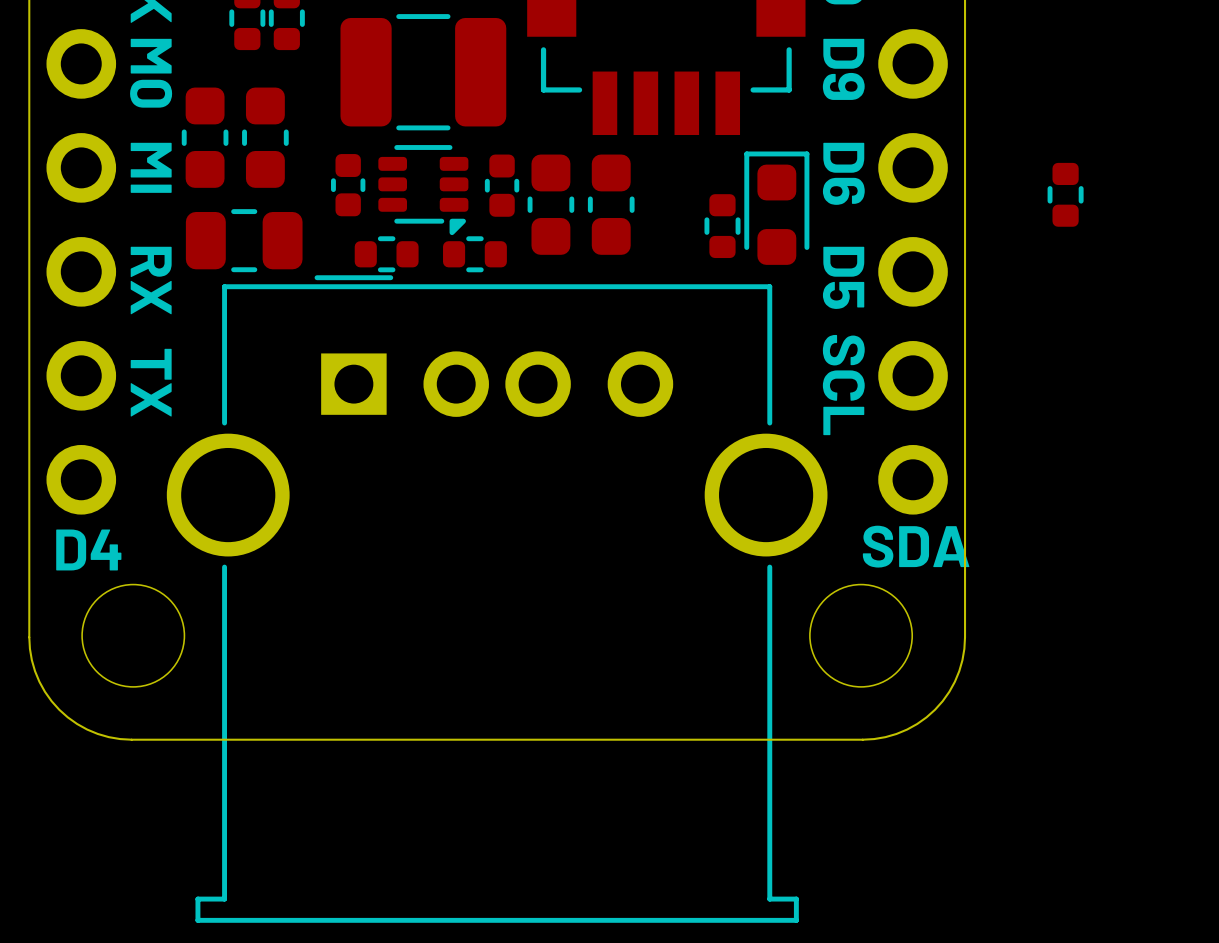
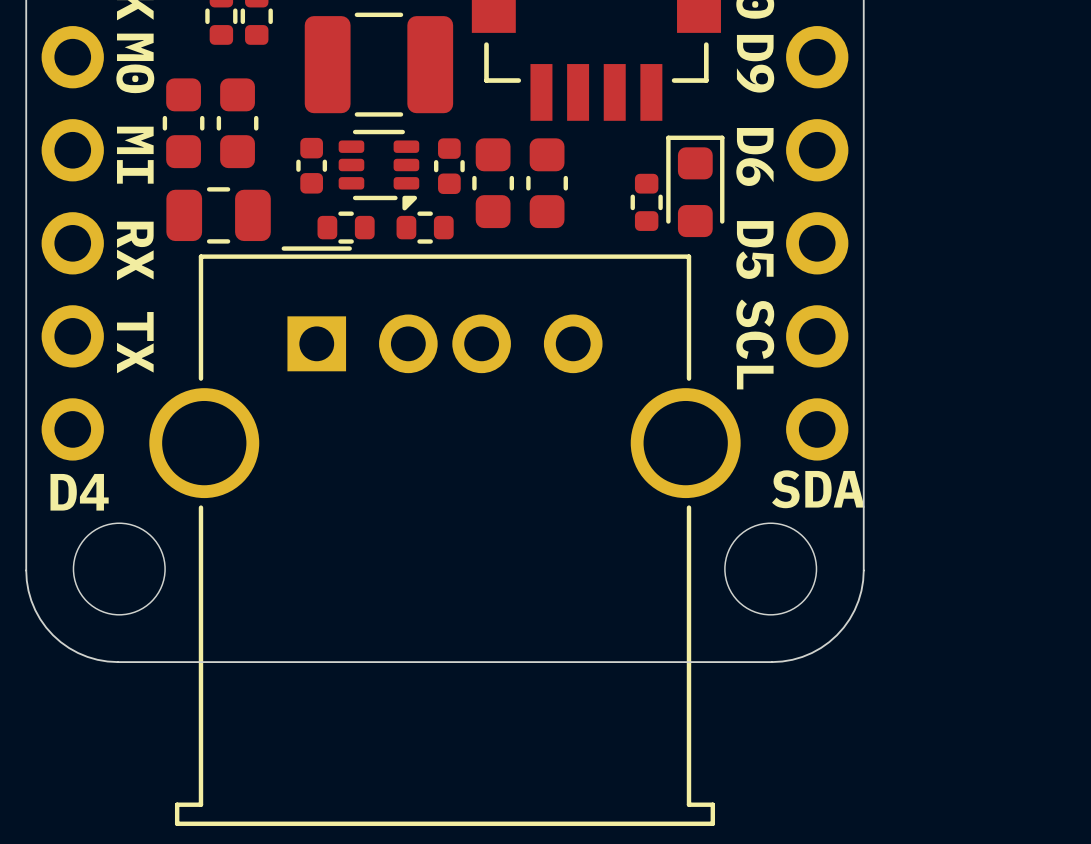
part: (1065, 194) -> none

